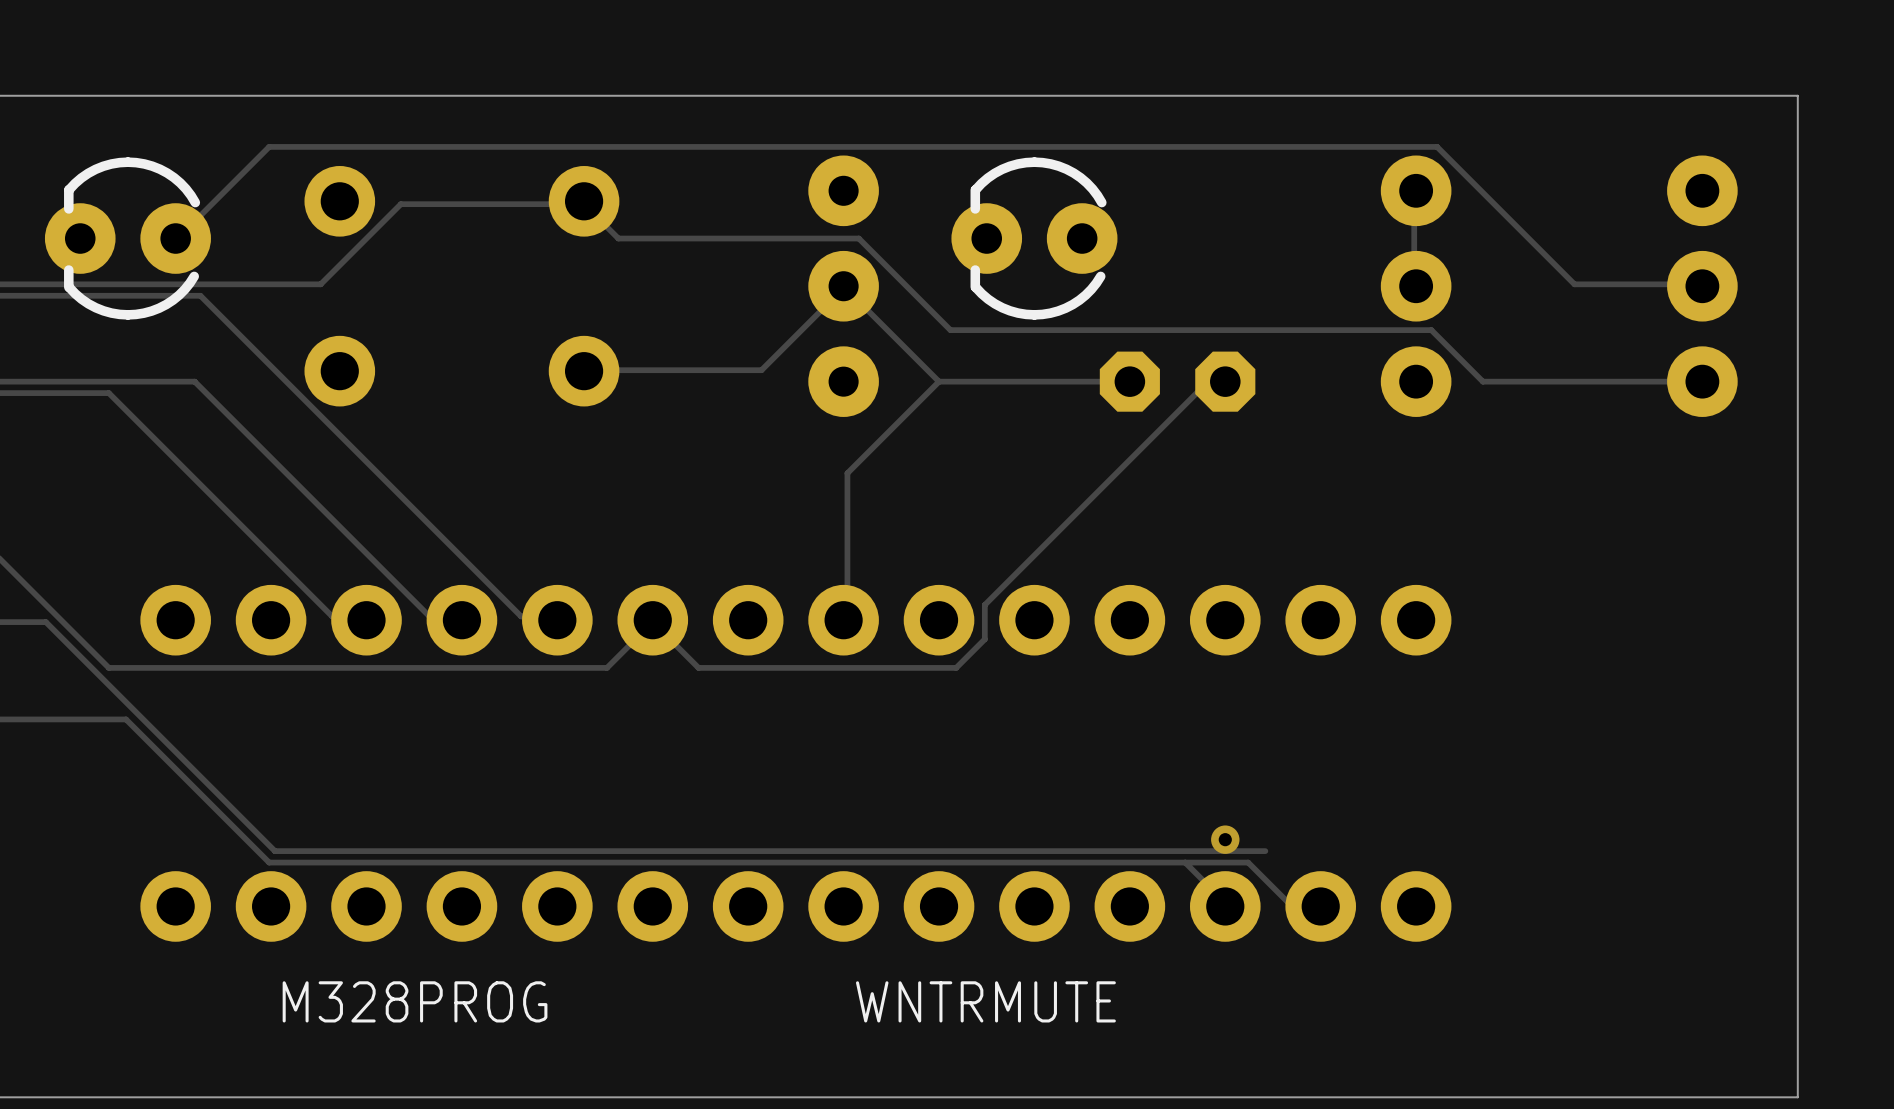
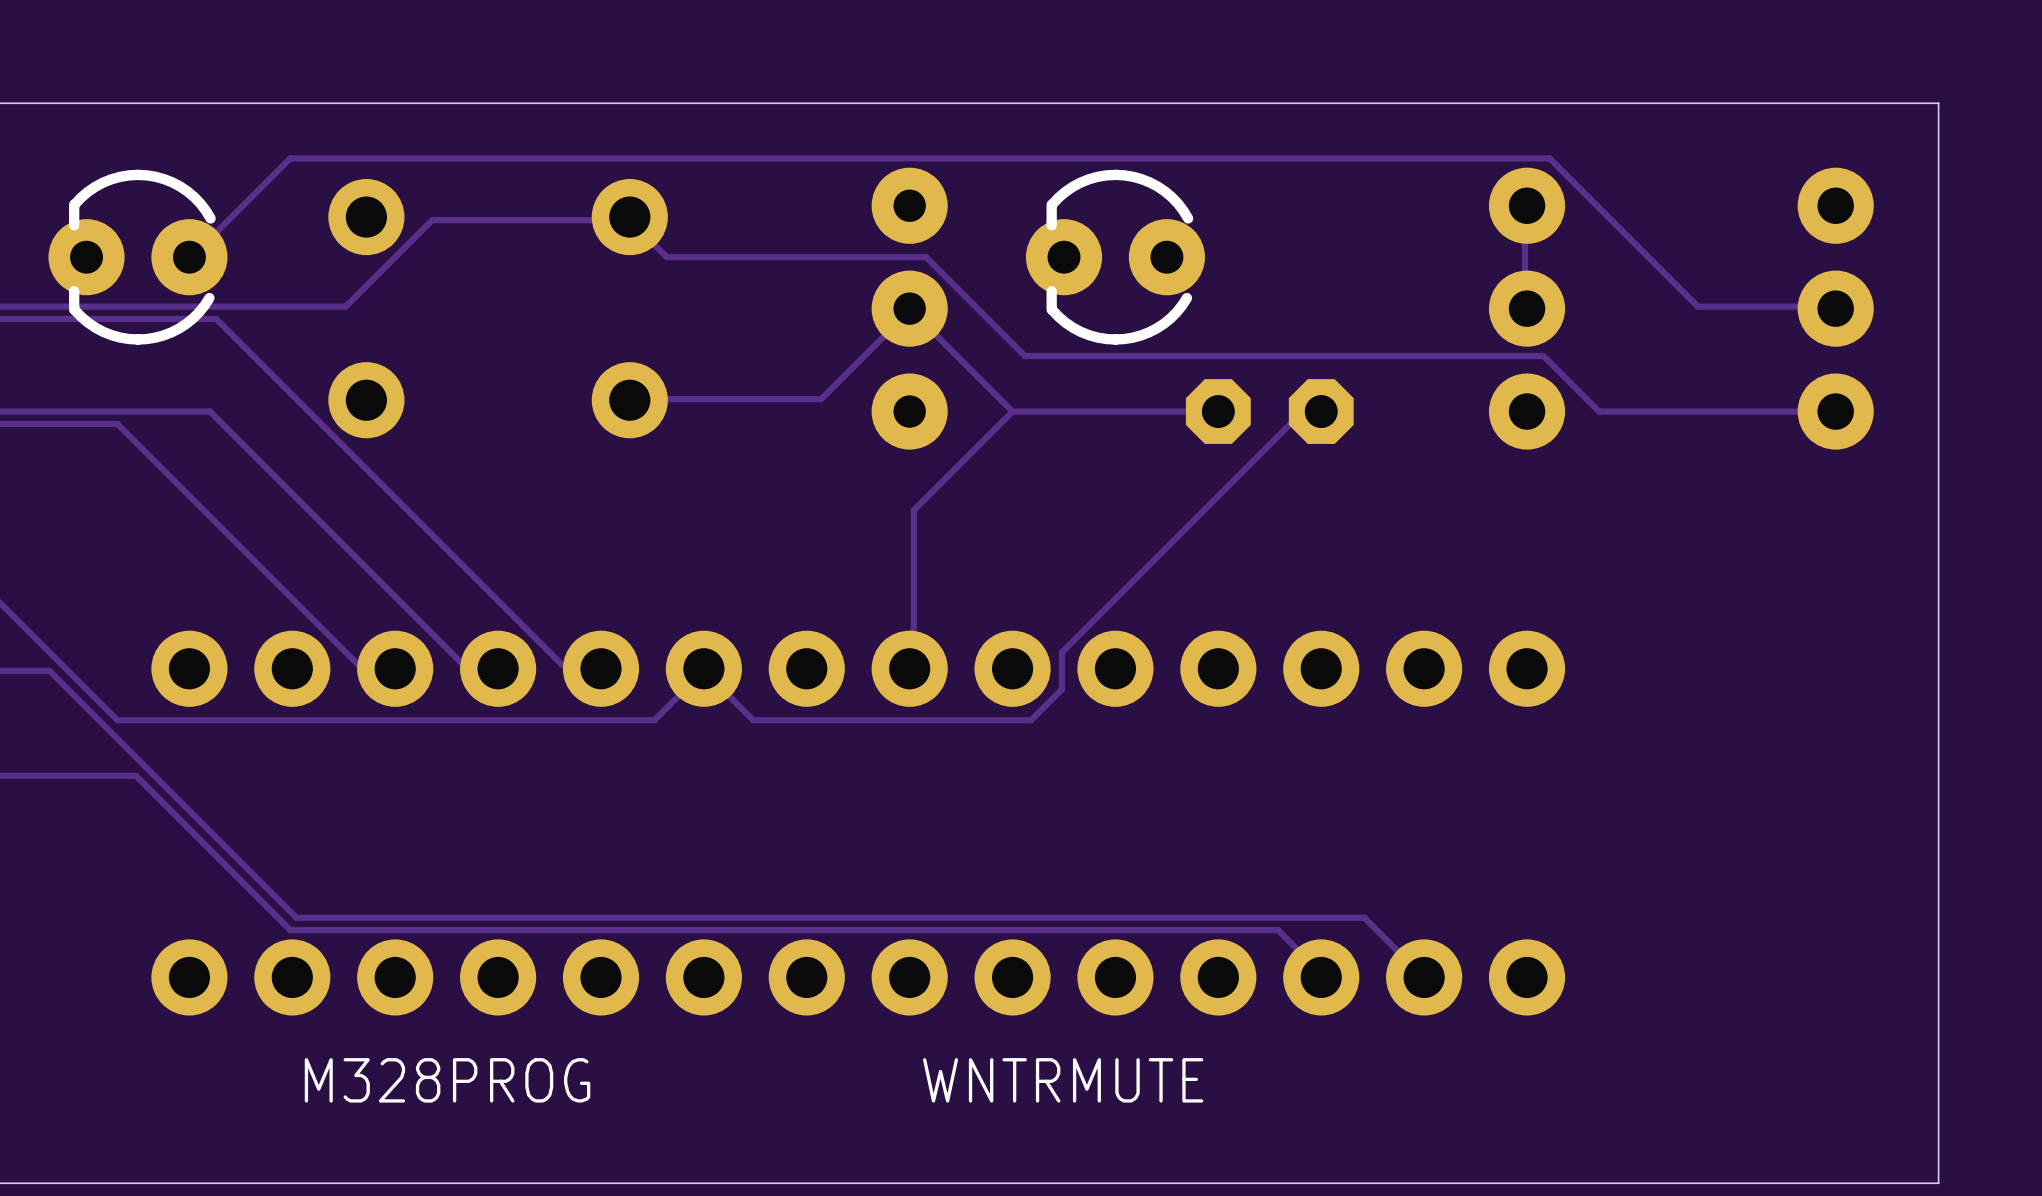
via: (1225, 839) -> none
track: (1185, 862) (1248, 862) (1288, 902) (1316, 902) -> (1364, 917) (1420, 973)

